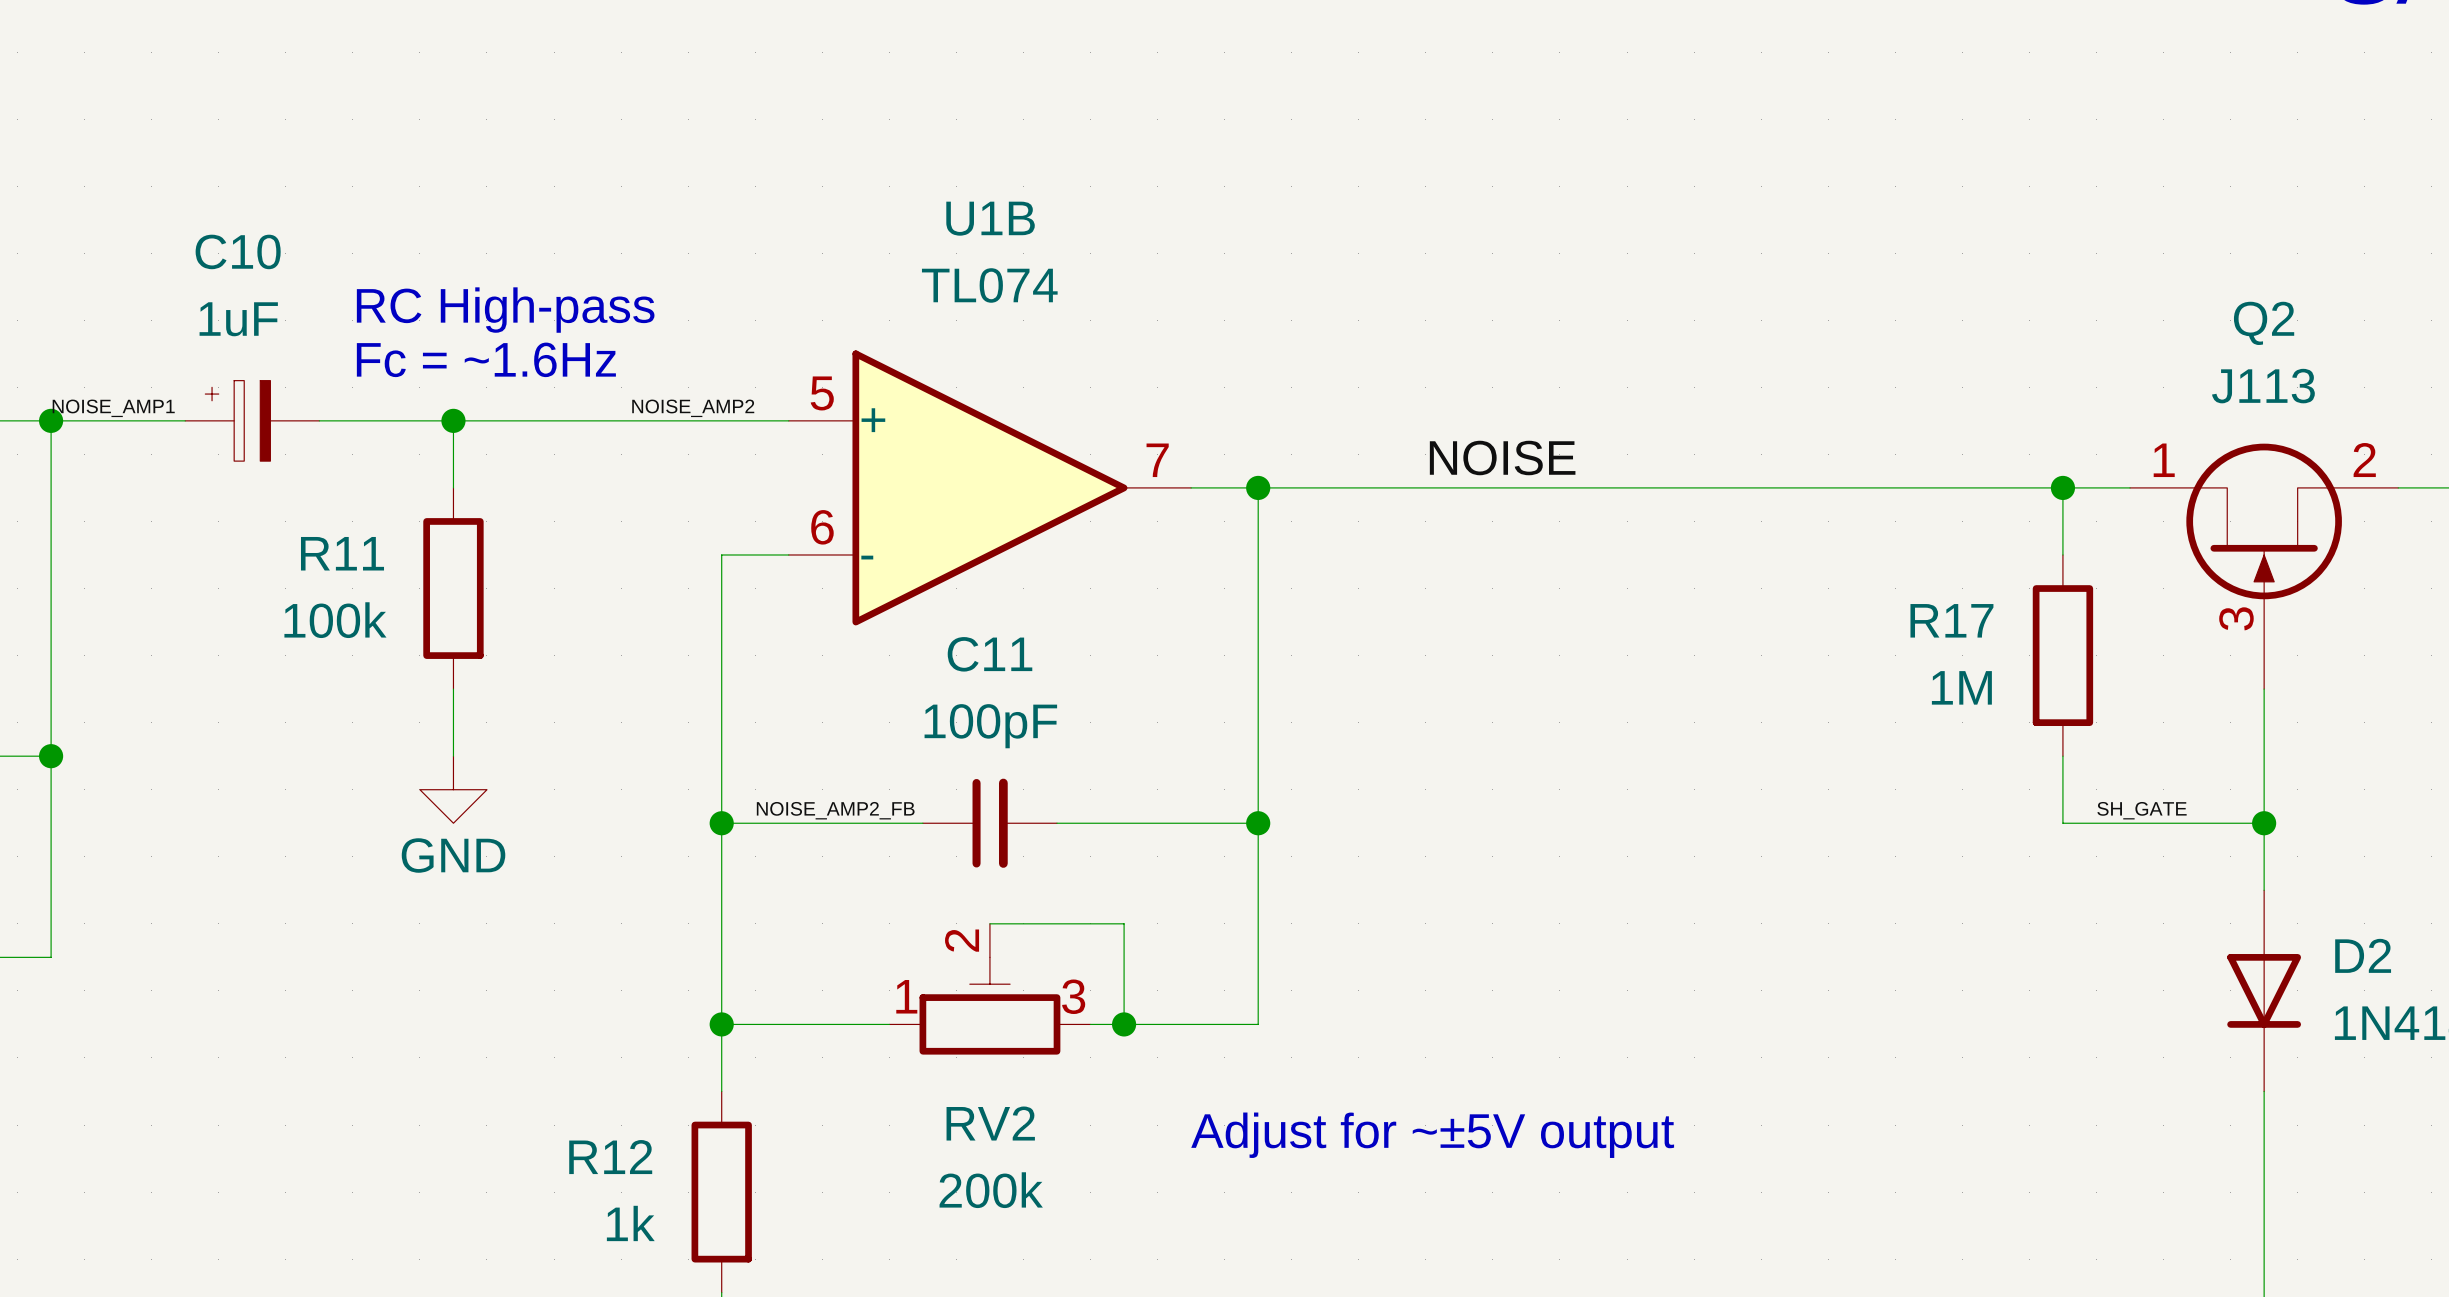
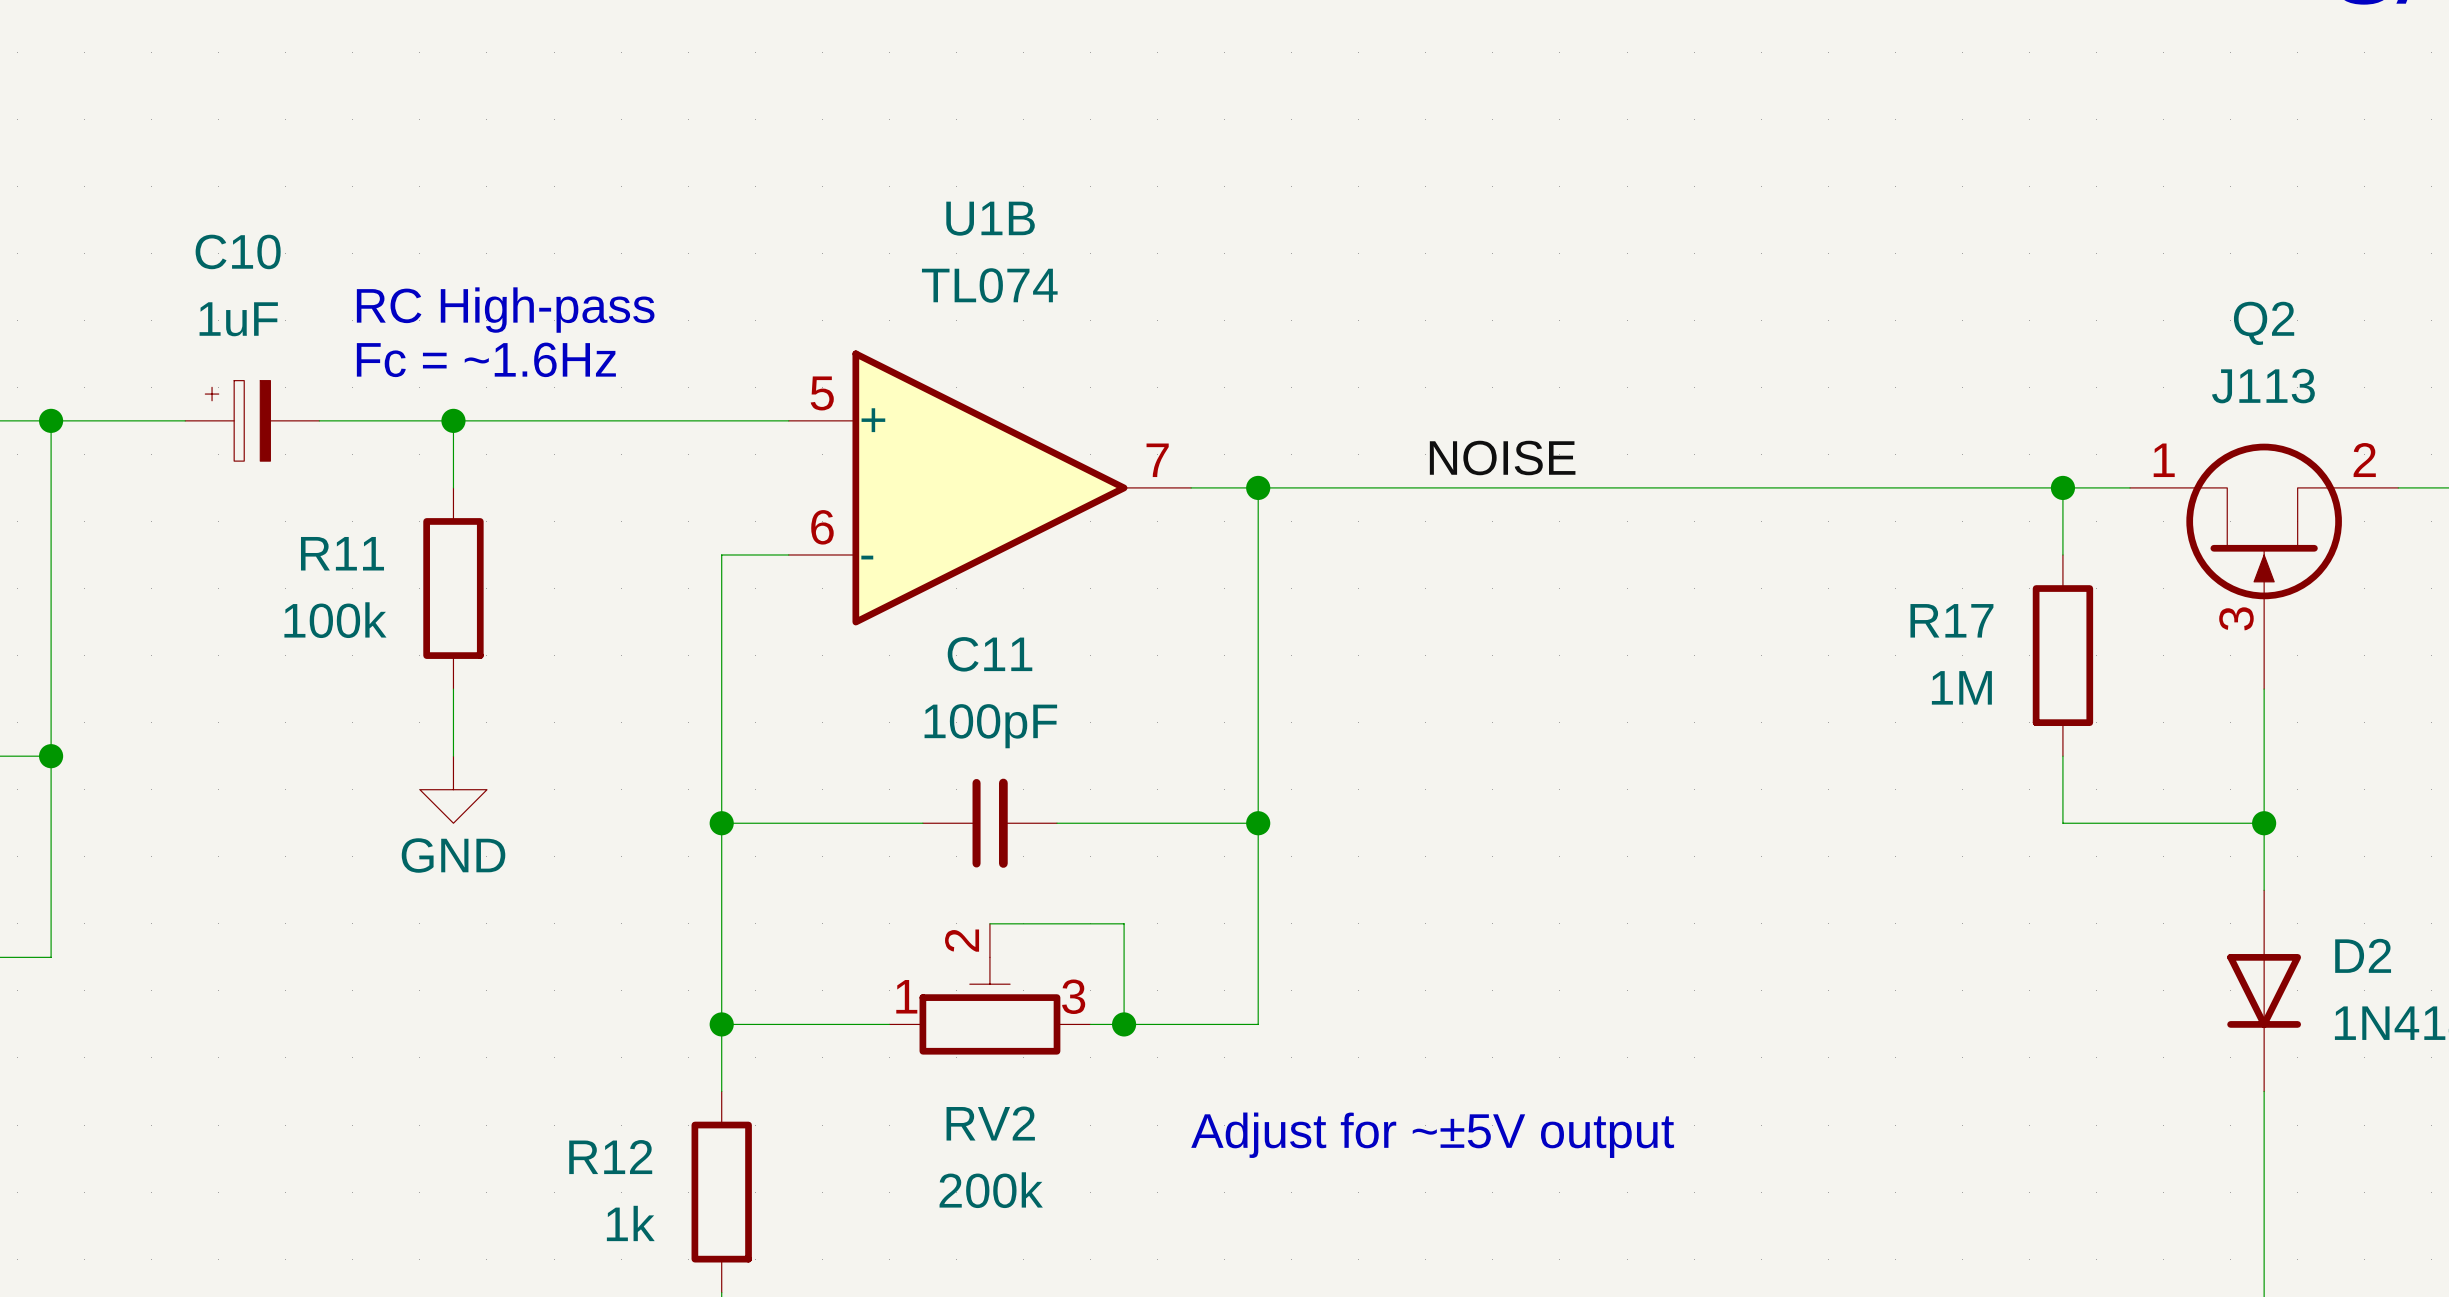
label: NOISE_AMP1 (113, 408) -> none
label: NOISE_AMP2 (693, 408) -> none
label: NOISE_AMP2_FB (835, 810) -> none
label: SH_GATE (2142, 810) -> none

